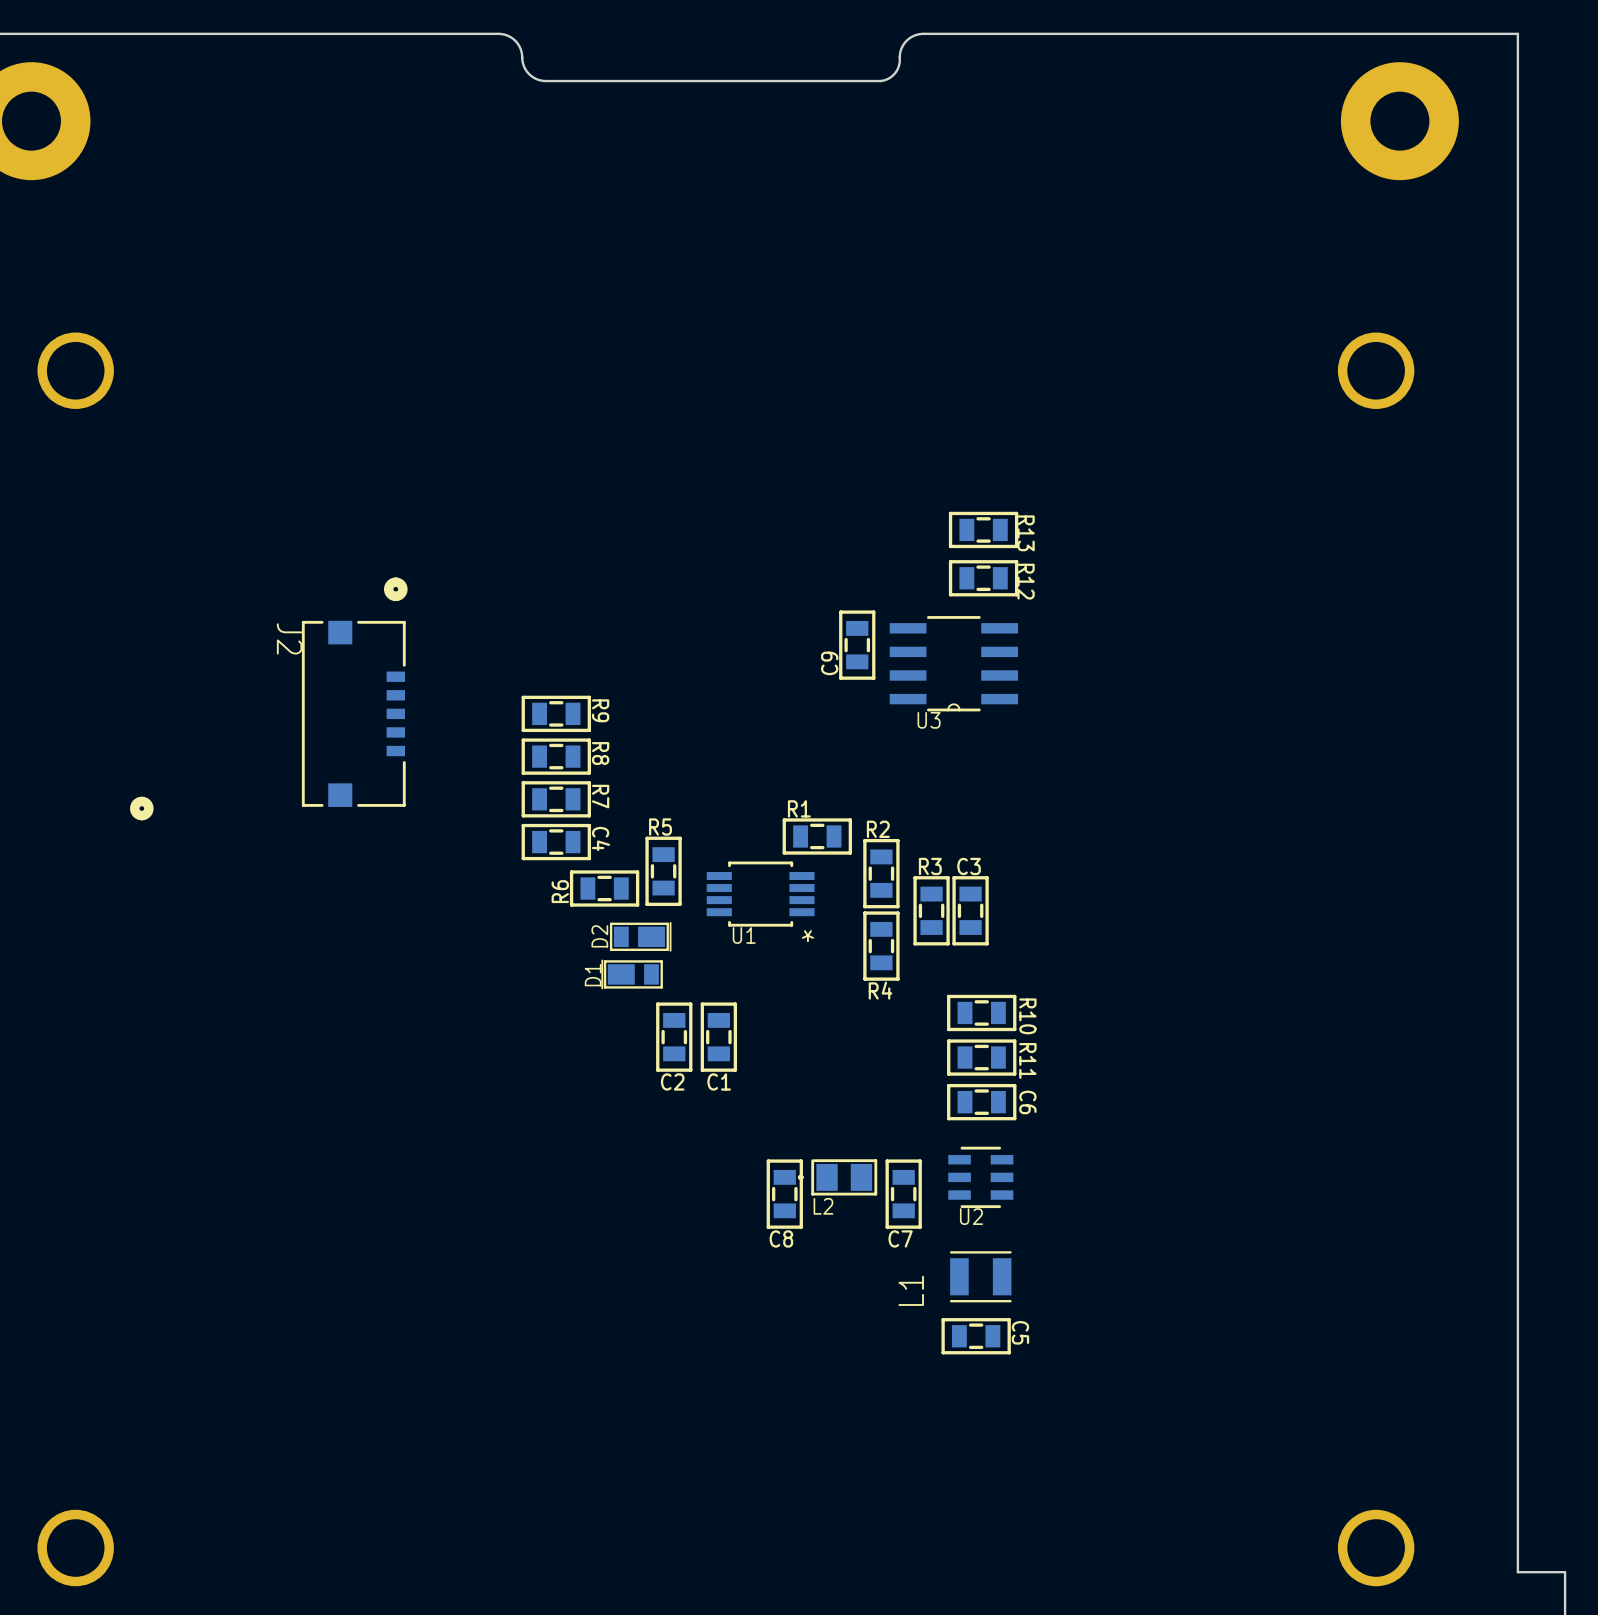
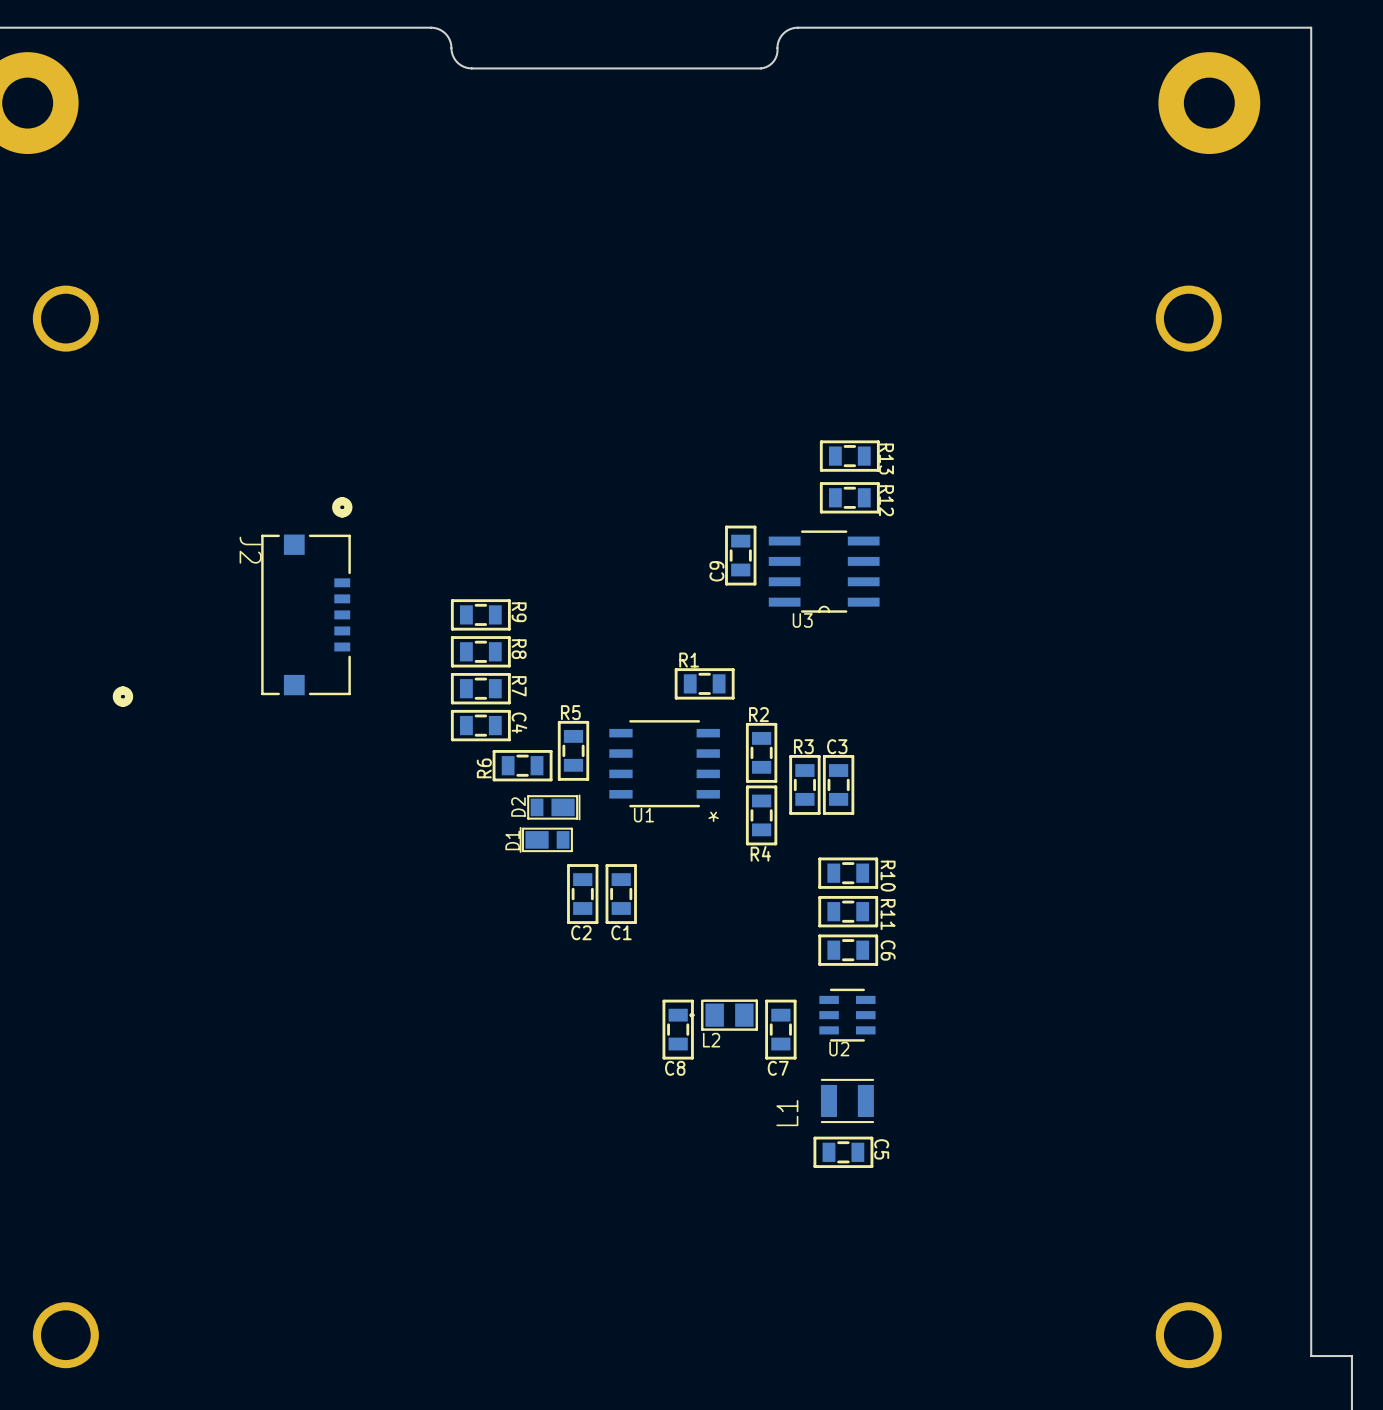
R1 position: (817, 836) -> (704, 683)
U1 footprint: [706, 861, 815, 927] -> [609, 720, 720, 808]

